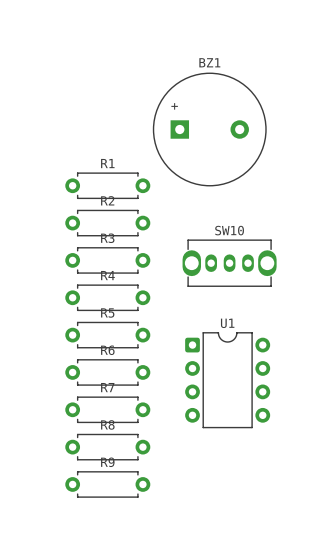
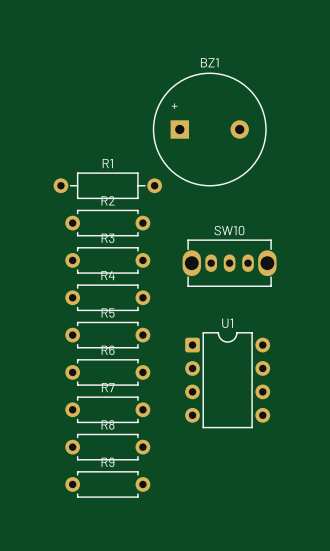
R1 footprint: [65, 172, 151, 199] -> [53, 172, 163, 199]

